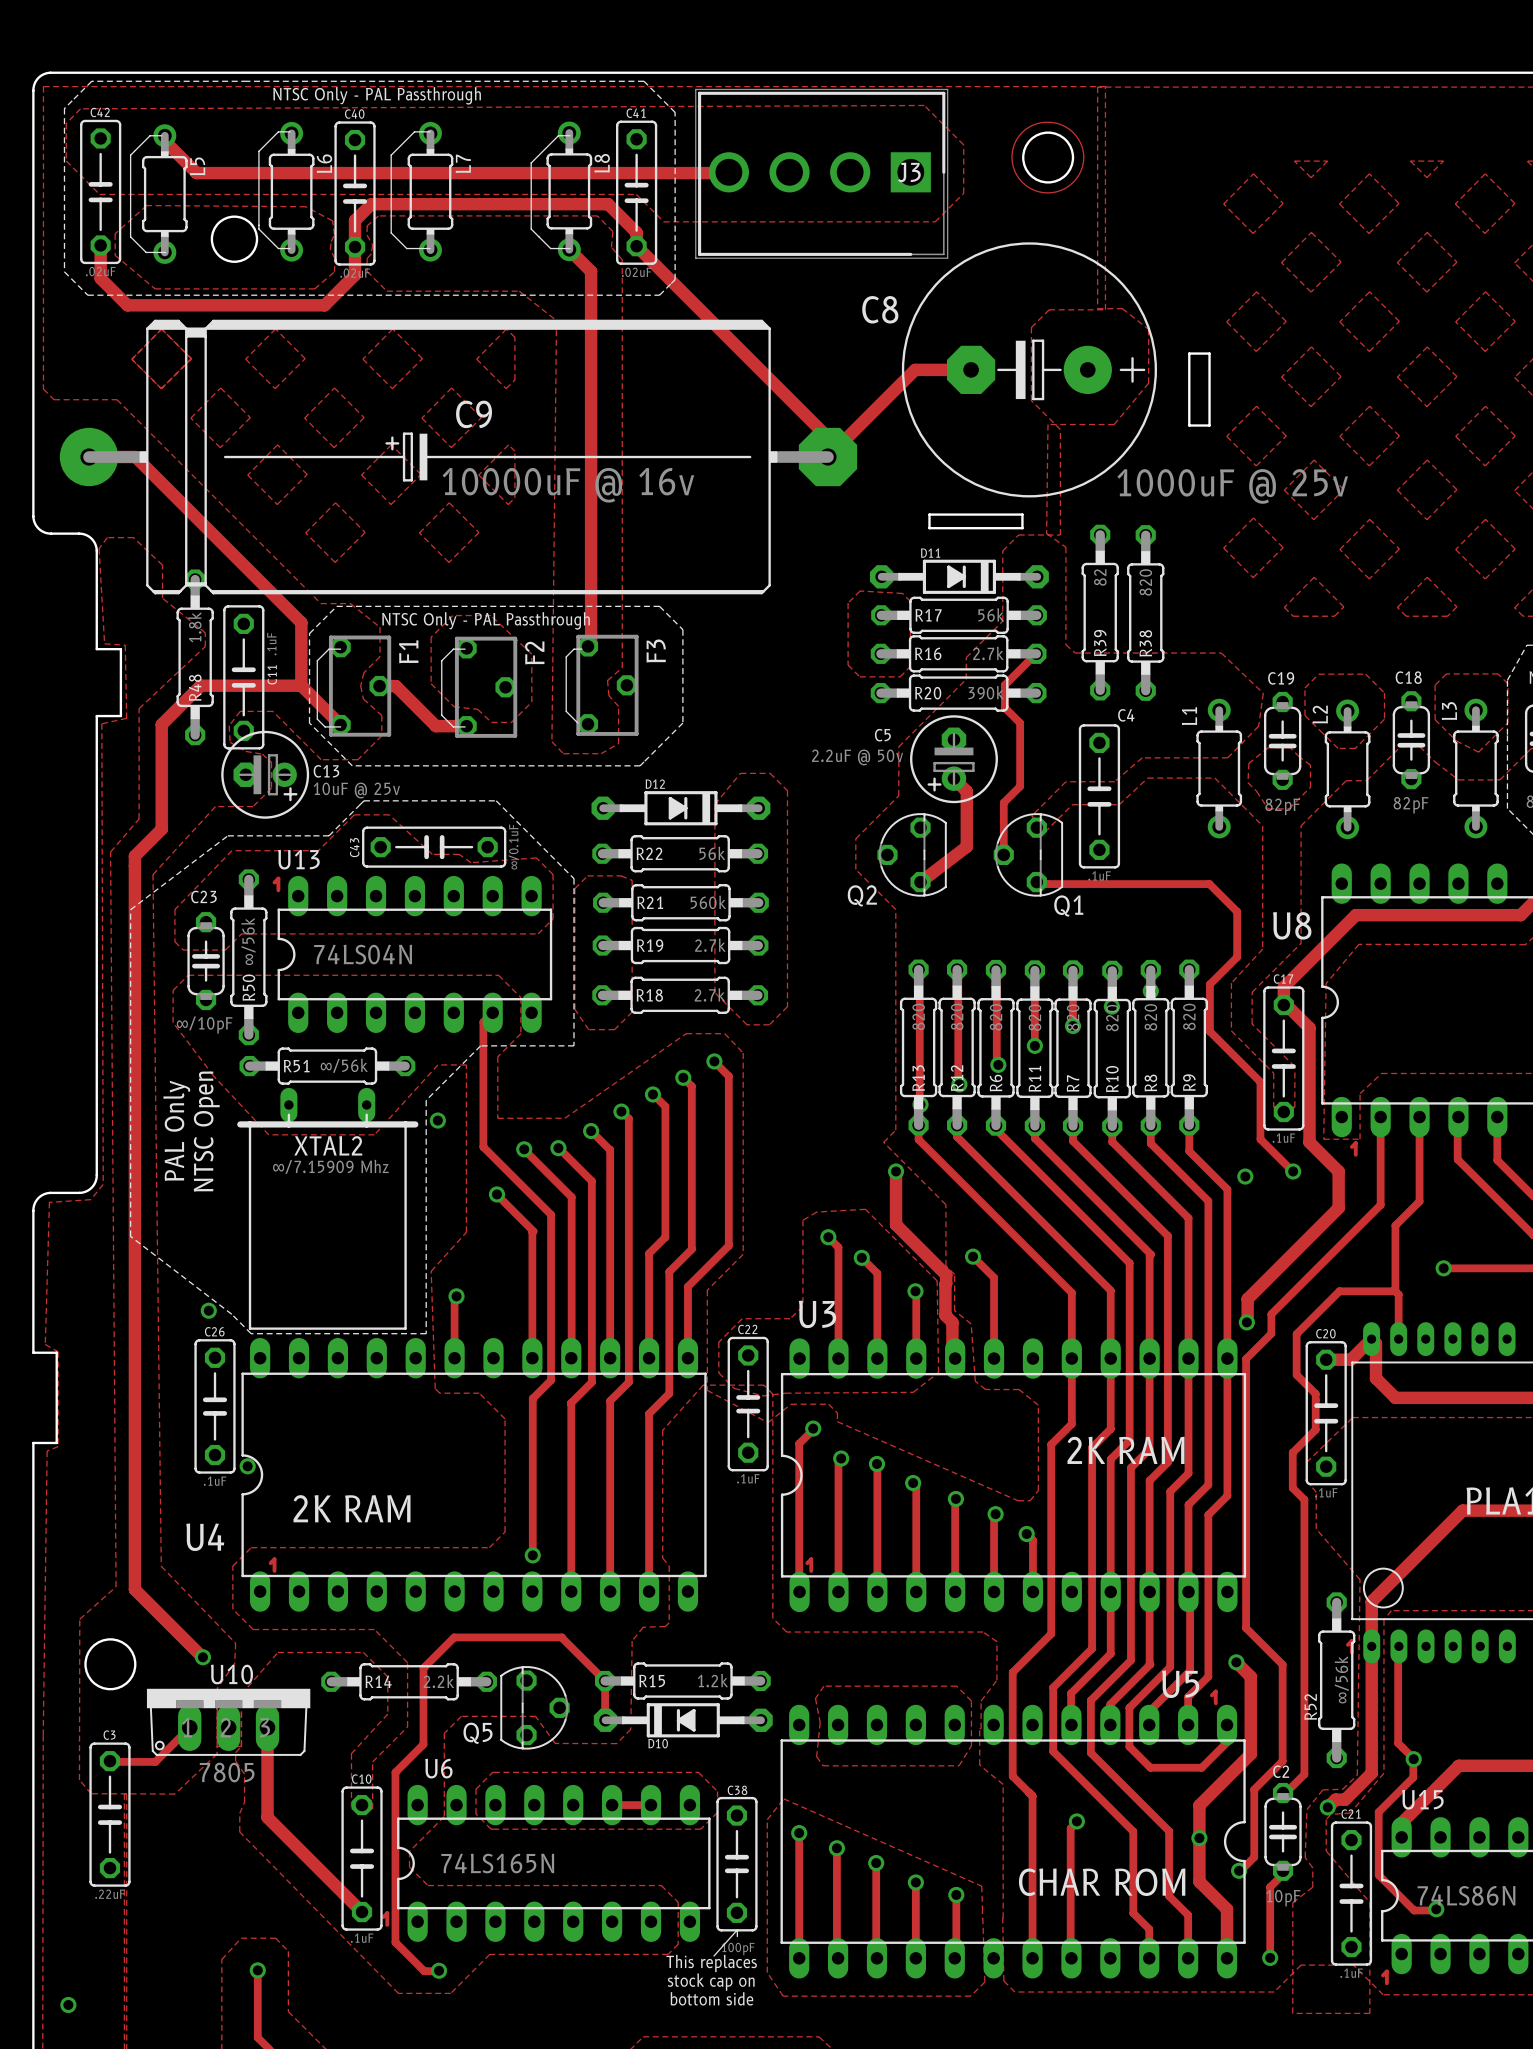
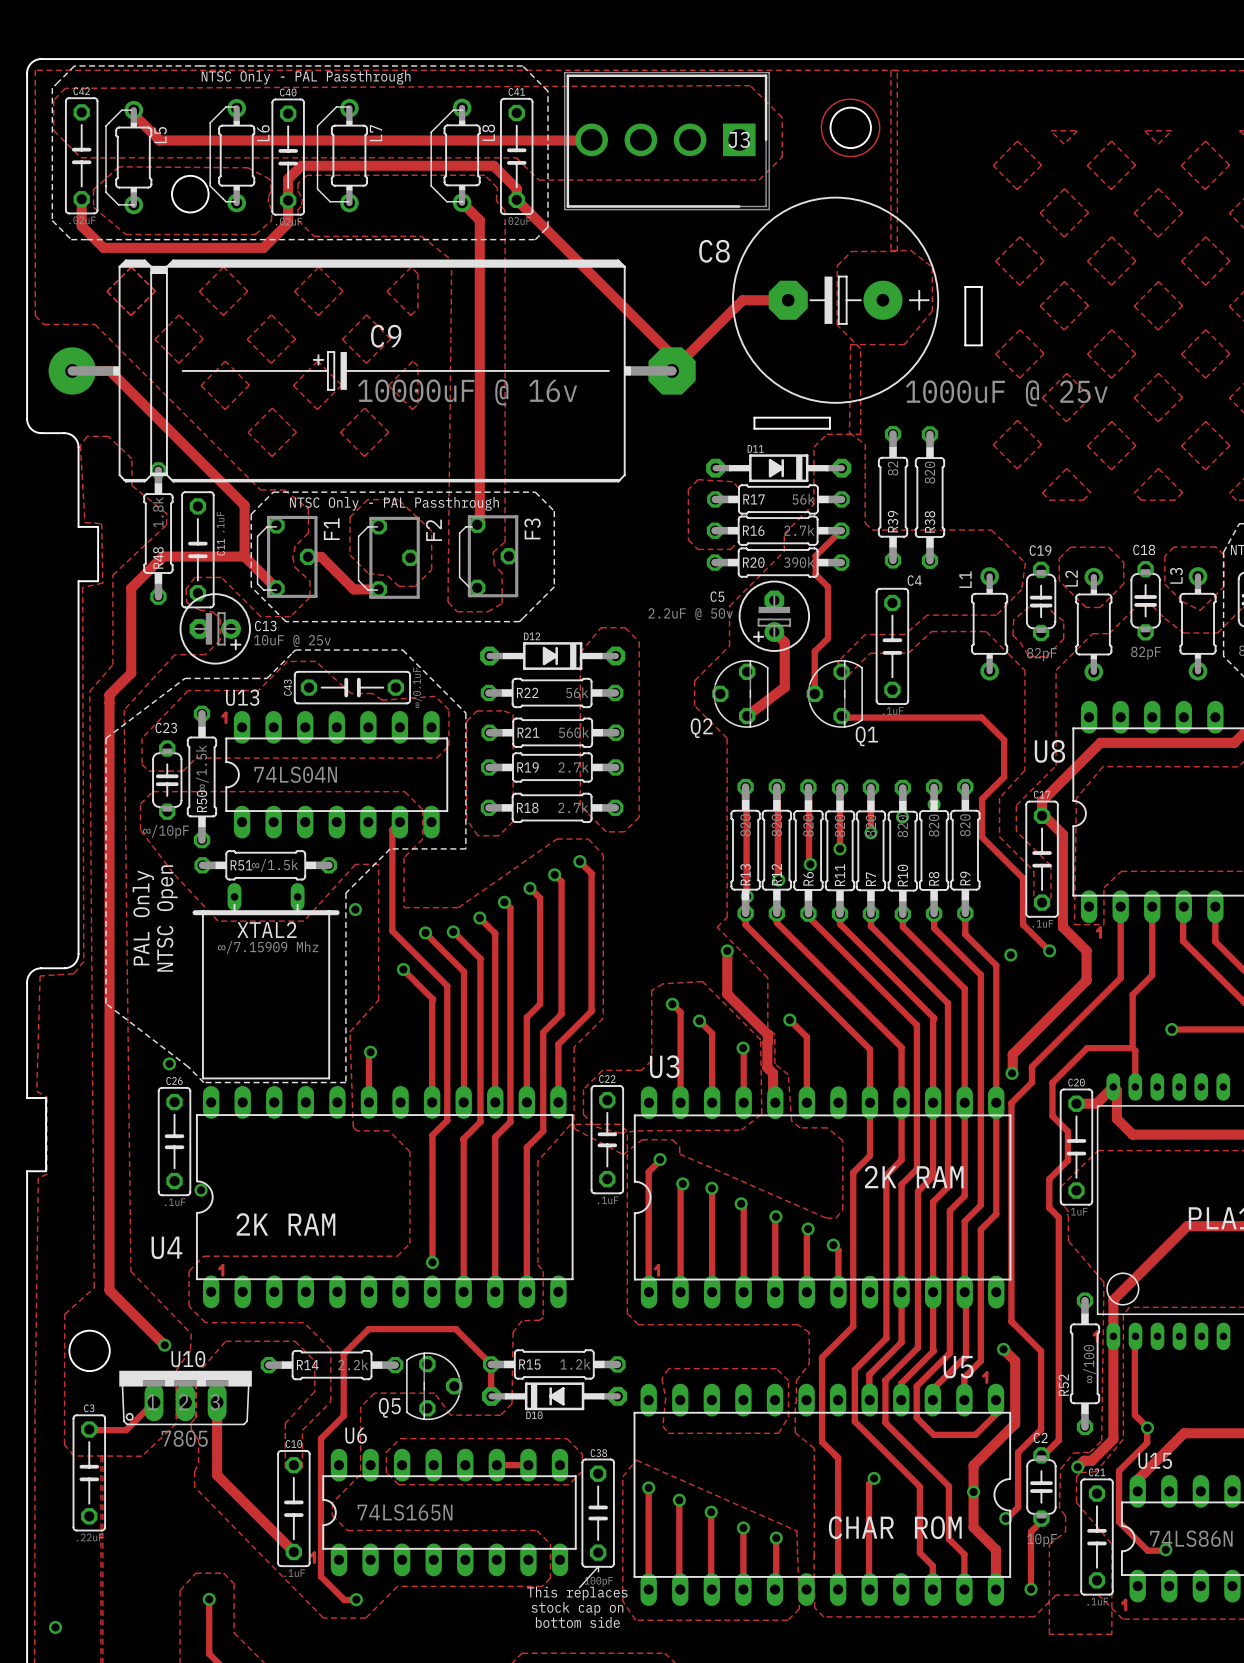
R50 value: ∞/56k (248, 941) -> ∞/1.5k (202, 768)
R51 value: ∞/56k (344, 1065) -> ∞/1.5k (275, 865)
R52 value: ∞/56k (1341, 1679) -> ∞/100 (1089, 1364)

